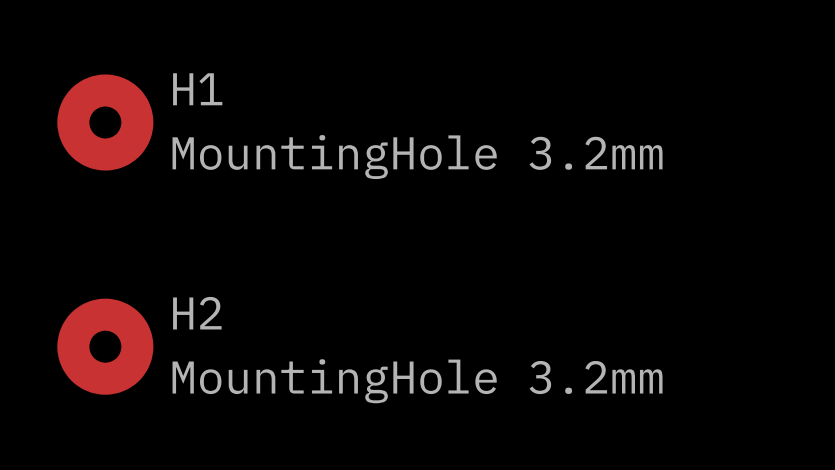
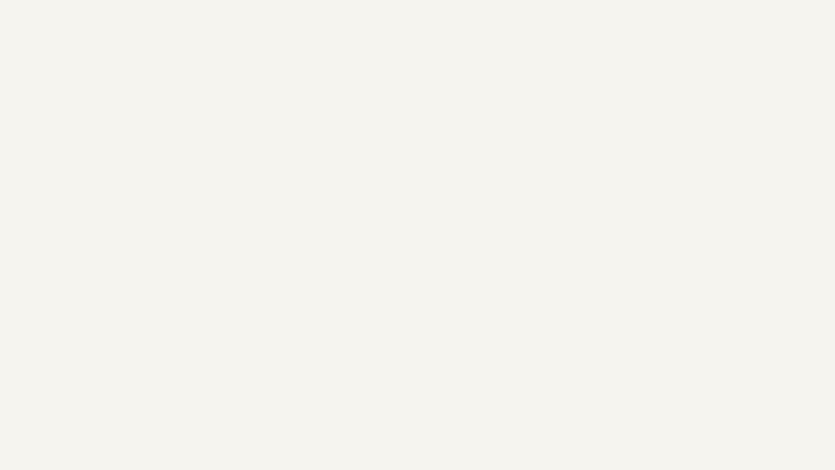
H1: MountingHole 3.2mm (105, 122) -> none
H2: MountingHole 3.2mm (105, 346) -> none

